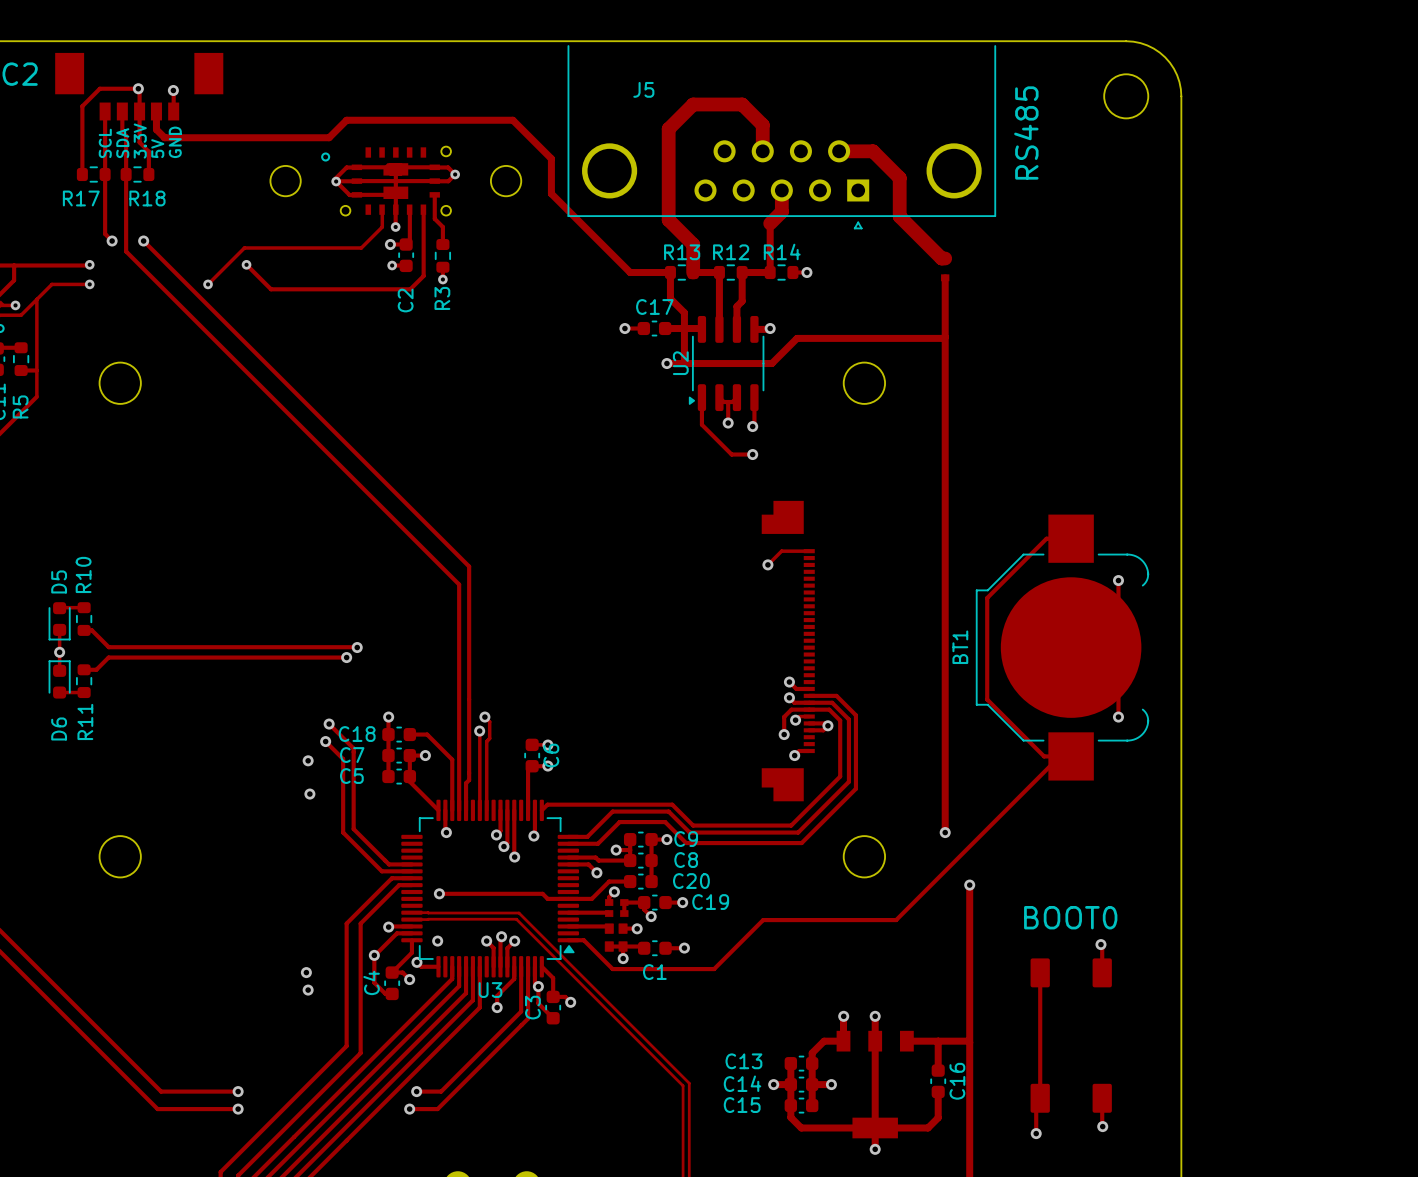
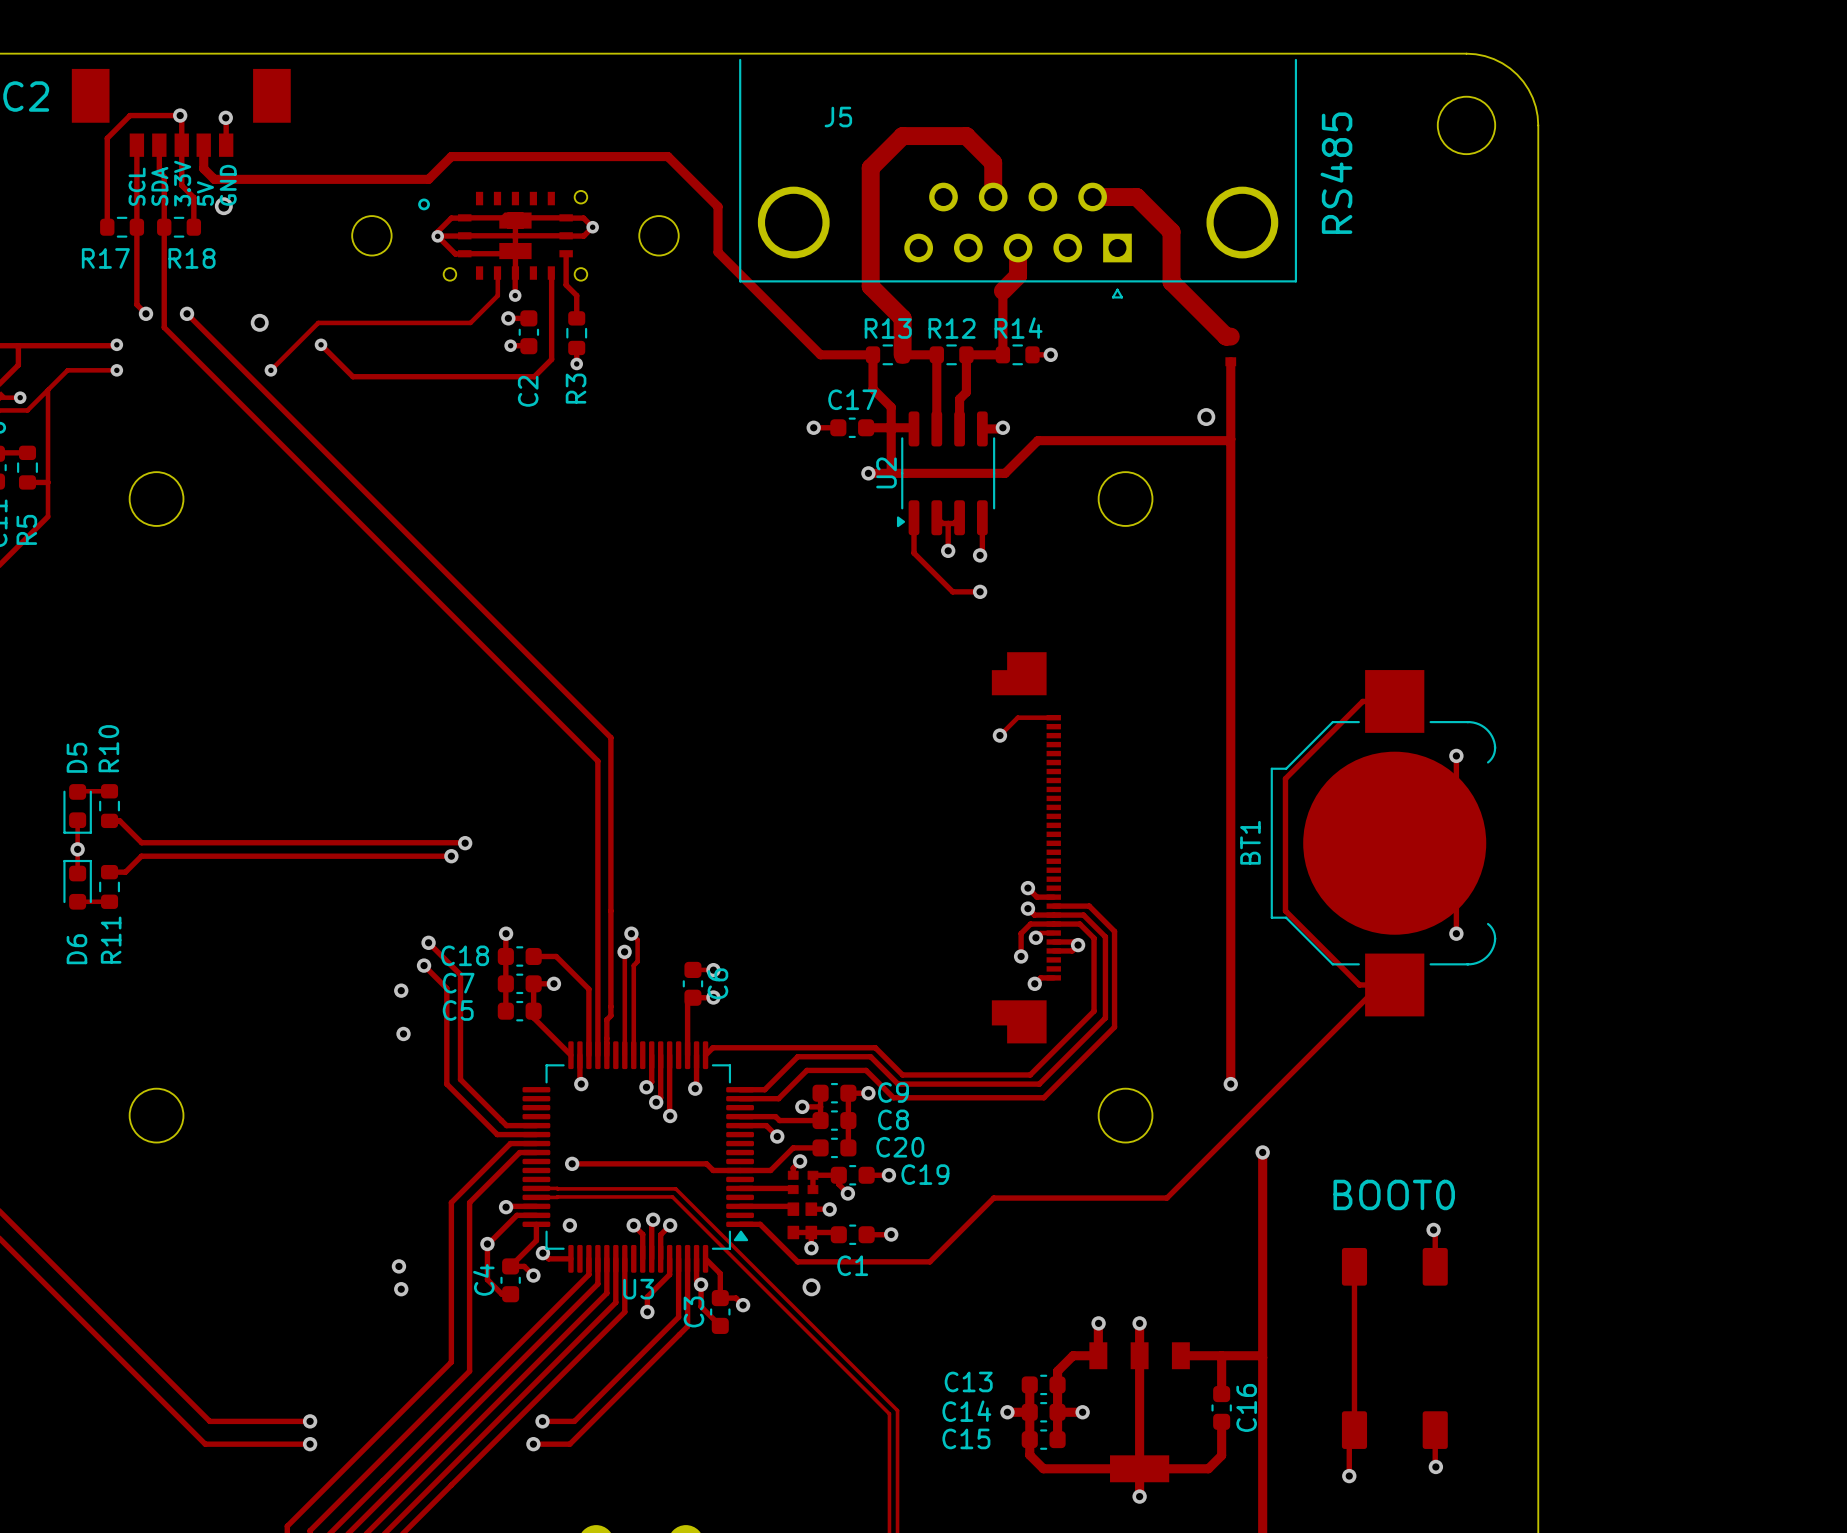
via: none -> (223, 206)
track: (409, 209) (409, 240) -> none
via: none -> (259, 322)
via: none -> (1206, 417)
via: none -> (811, 1287)

